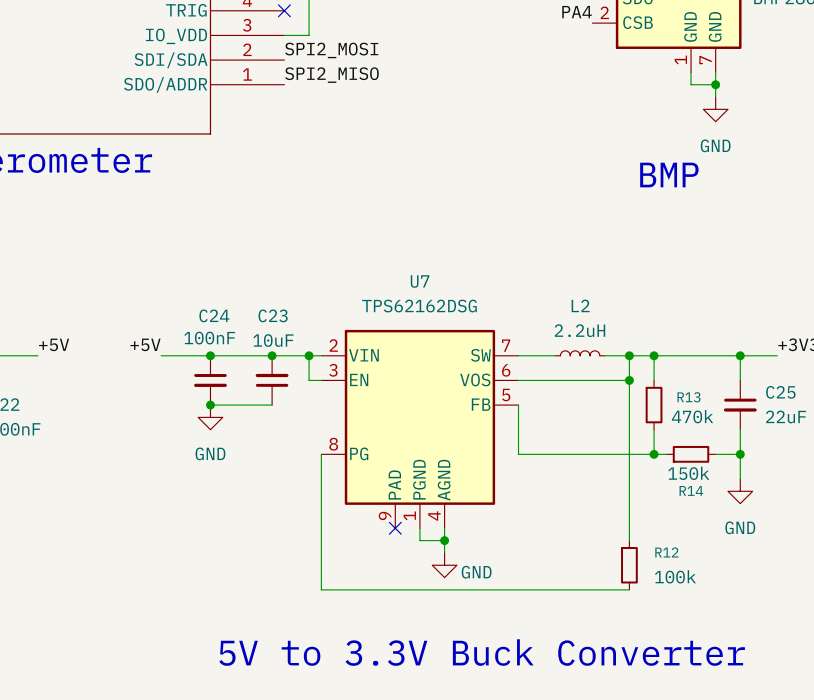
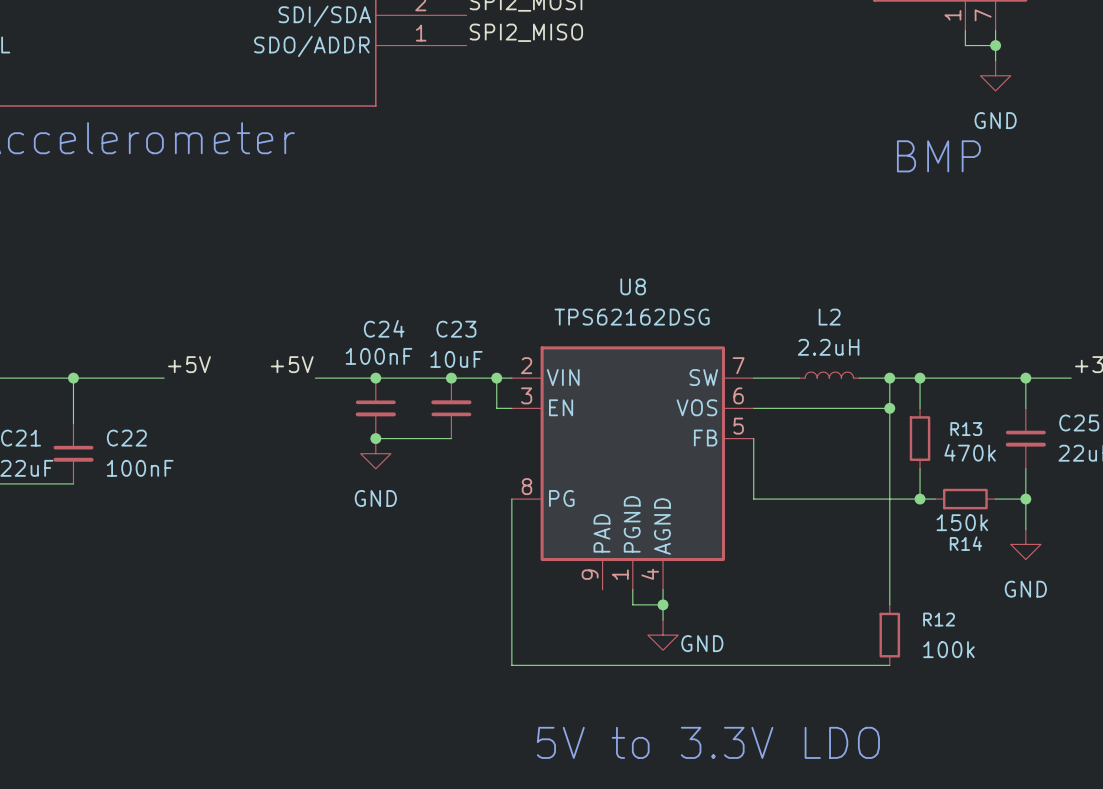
U7 name: U7 (420, 281) -> U8 (633, 286)
no-connect mark: (395, 528) -> none
text: 5V to 3.3V Buck Converter (482, 652) -> 5V to 3.3V LDO (708, 742)

